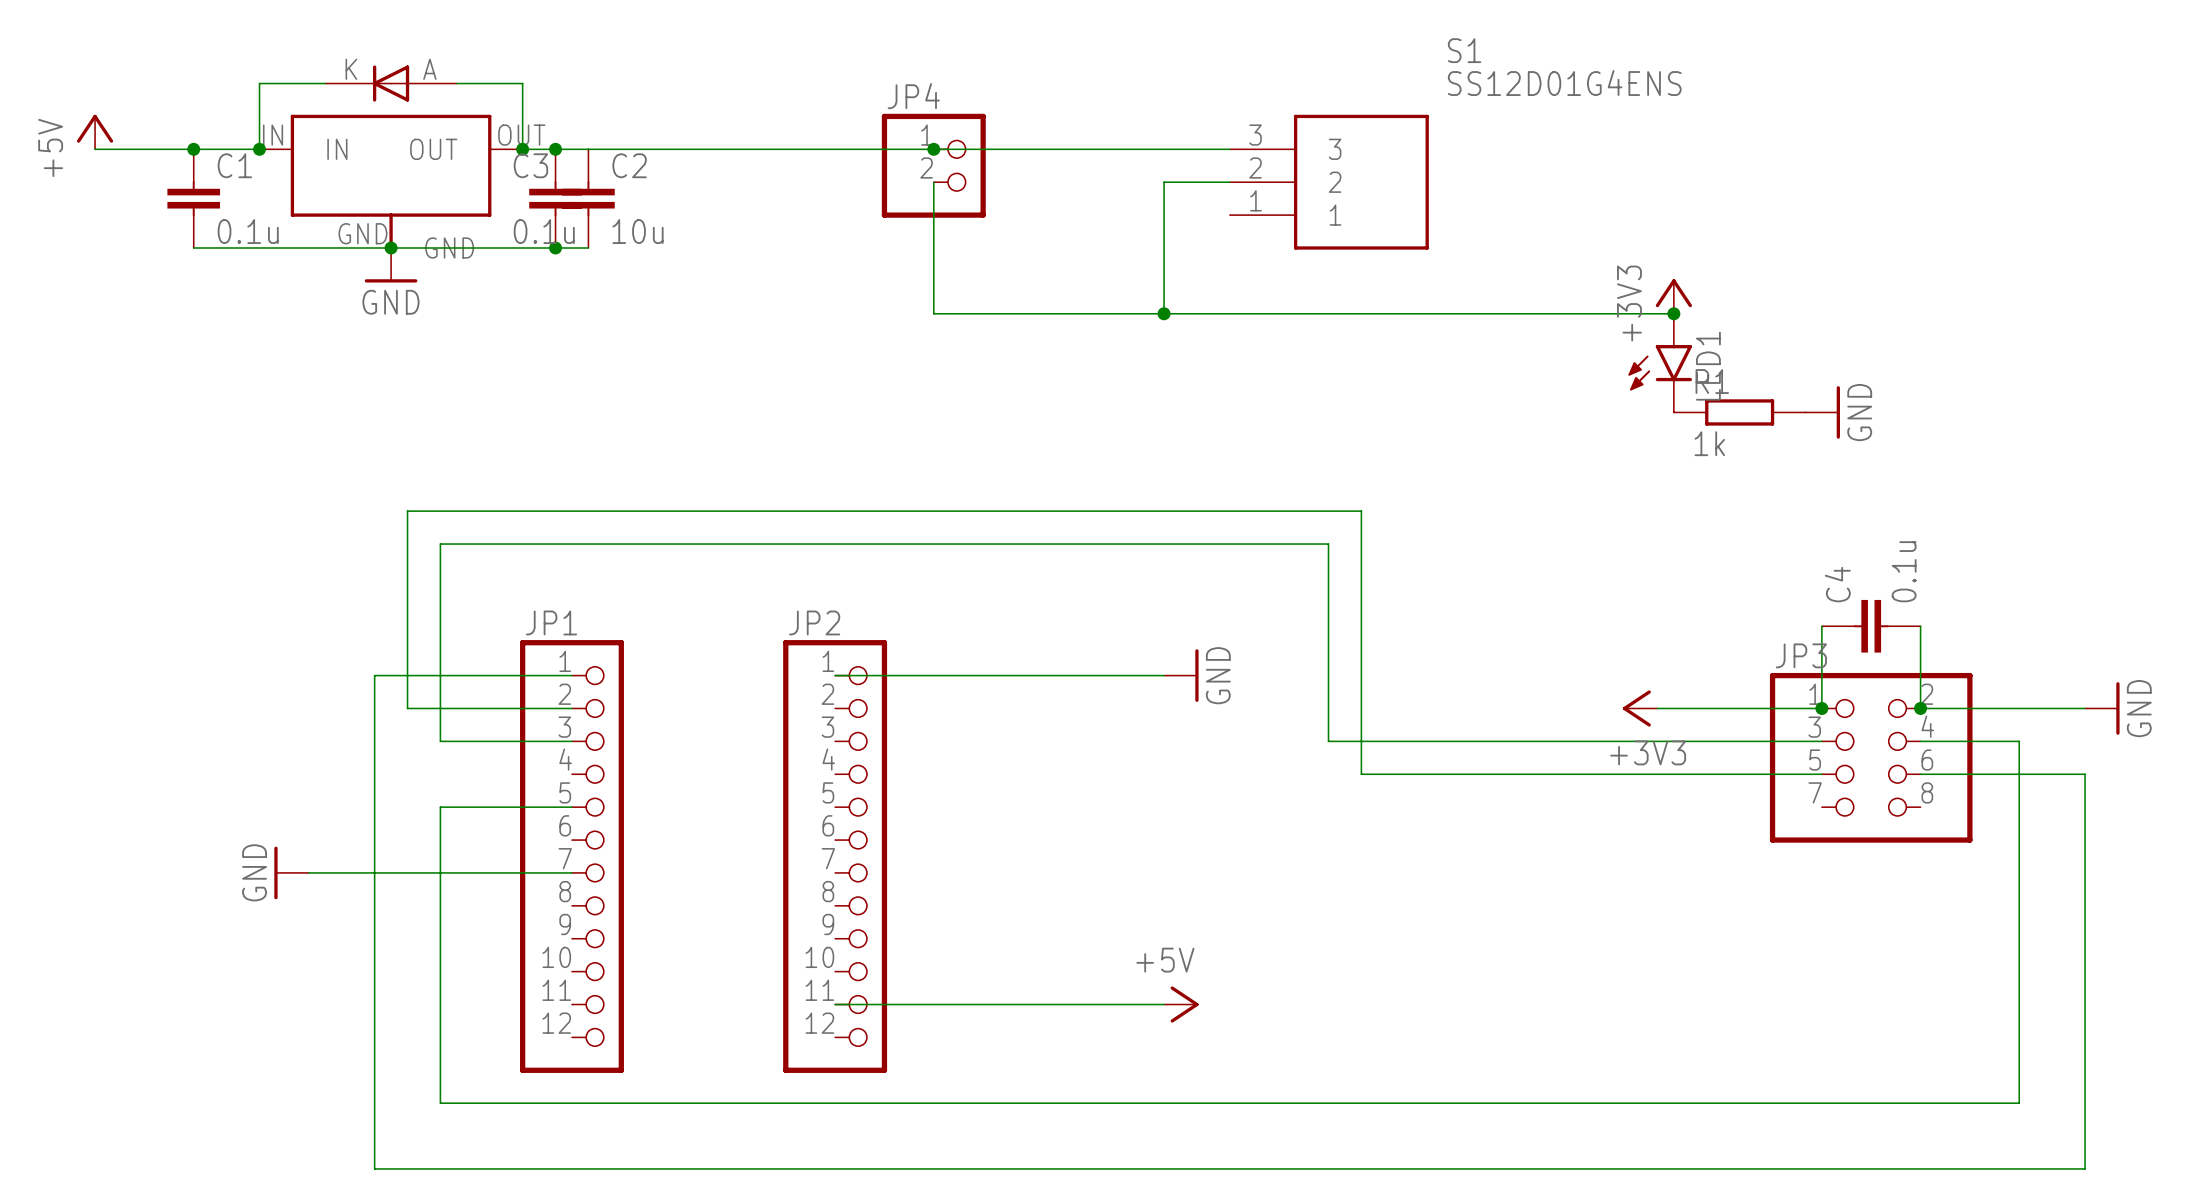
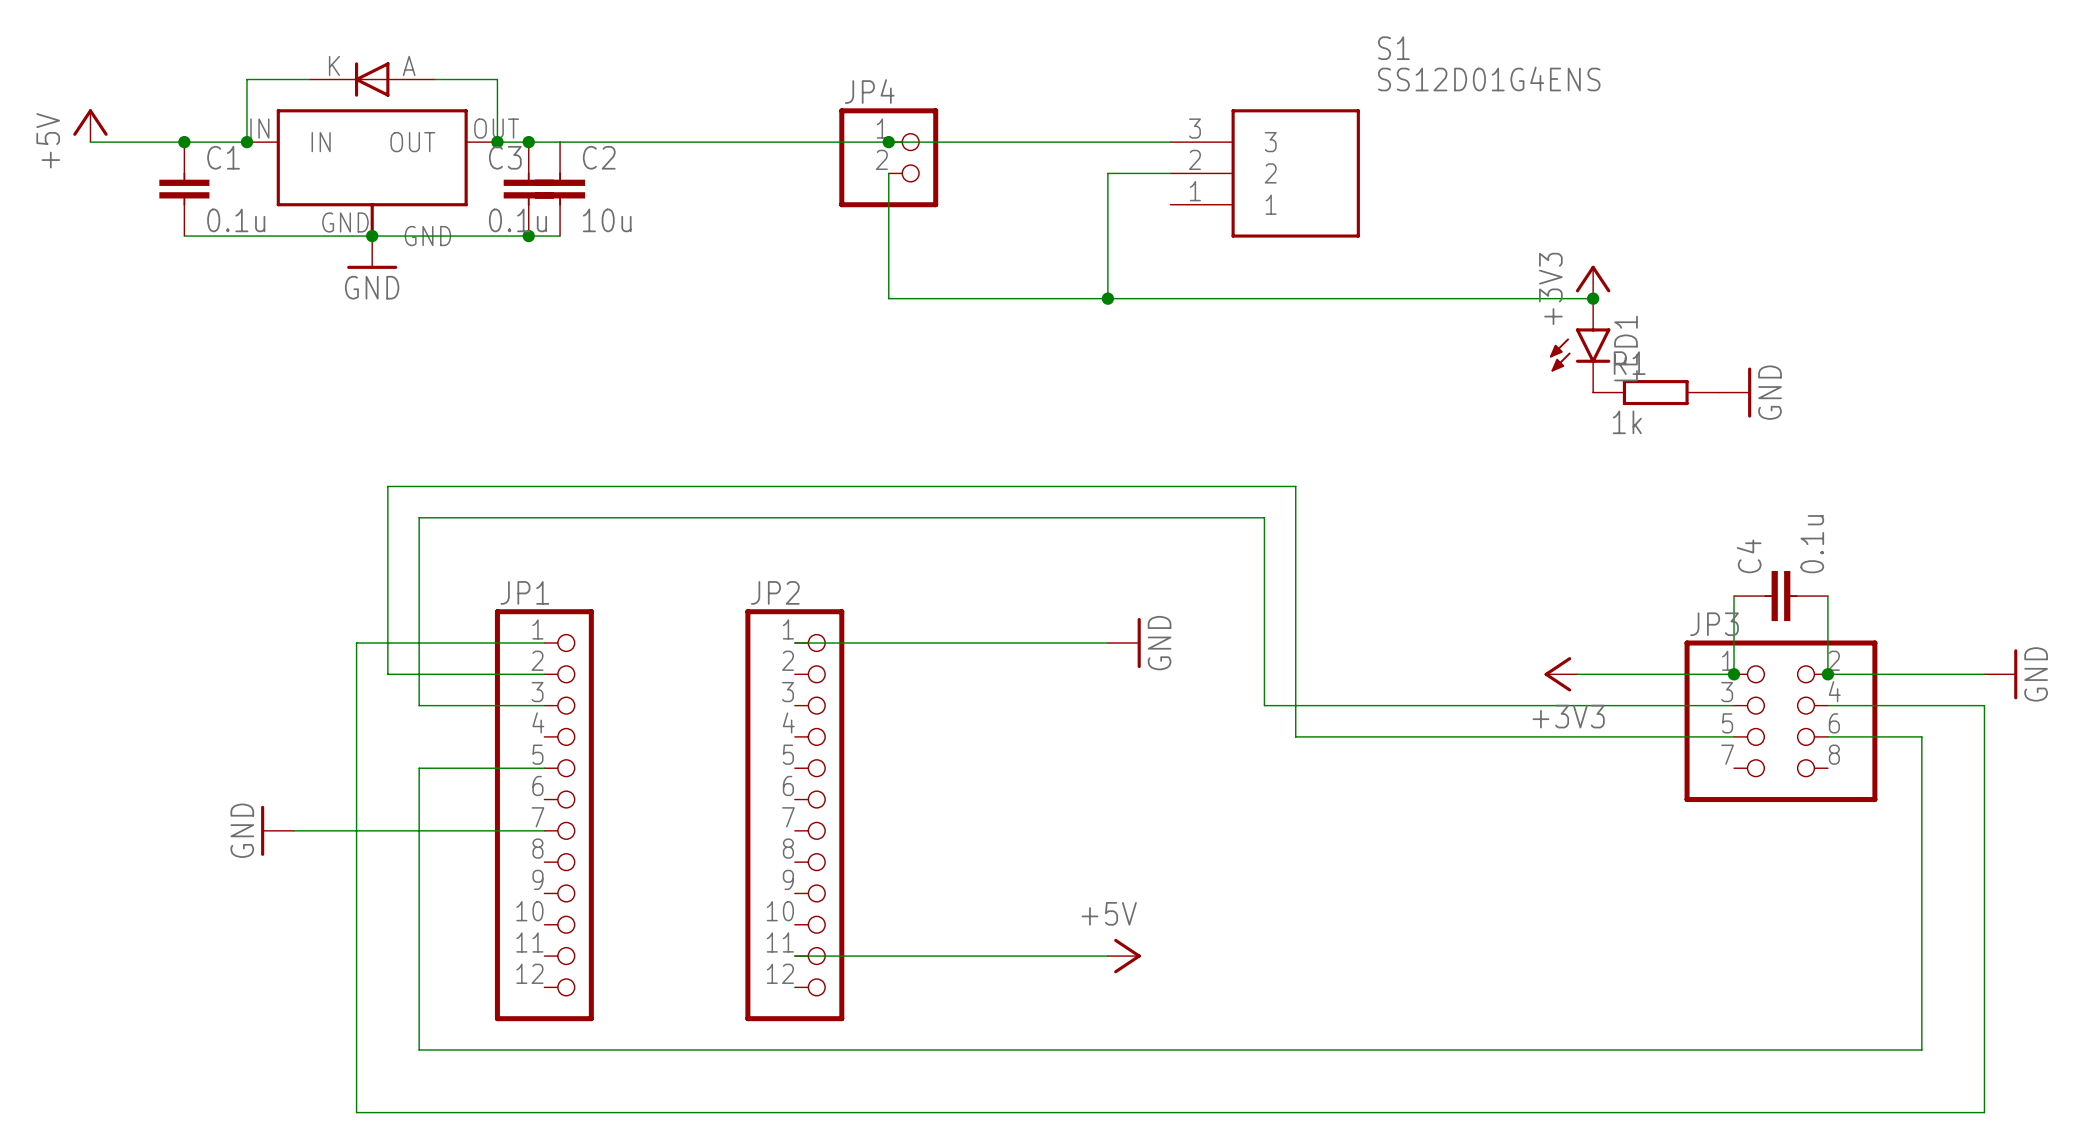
wire: (2019, 741) (2019, 774) (2085, 774) -> (1921, 705) (1984, 705) (1984, 736)

